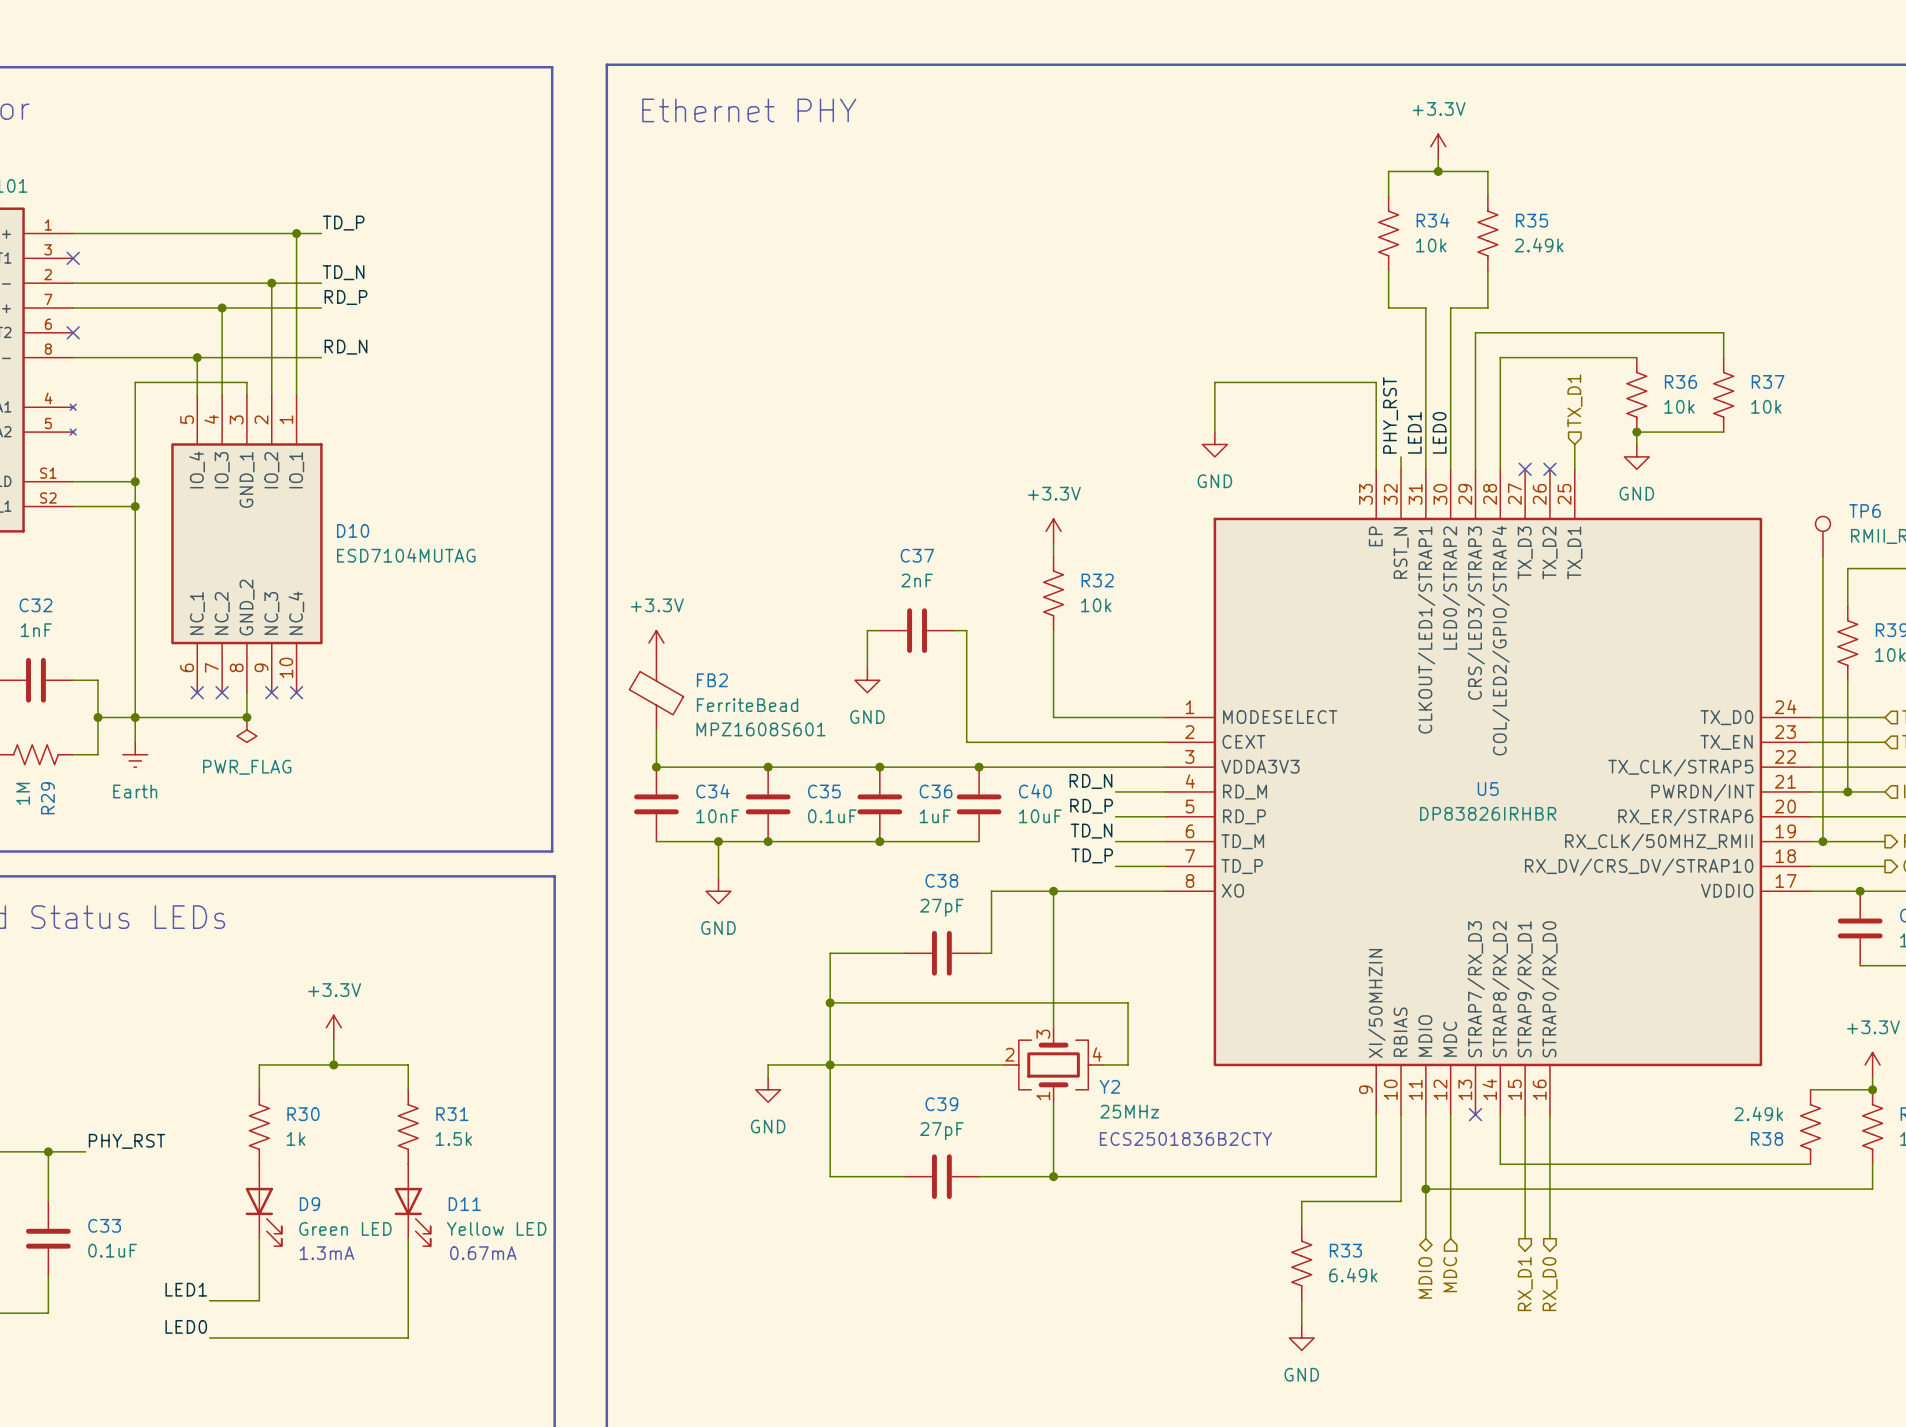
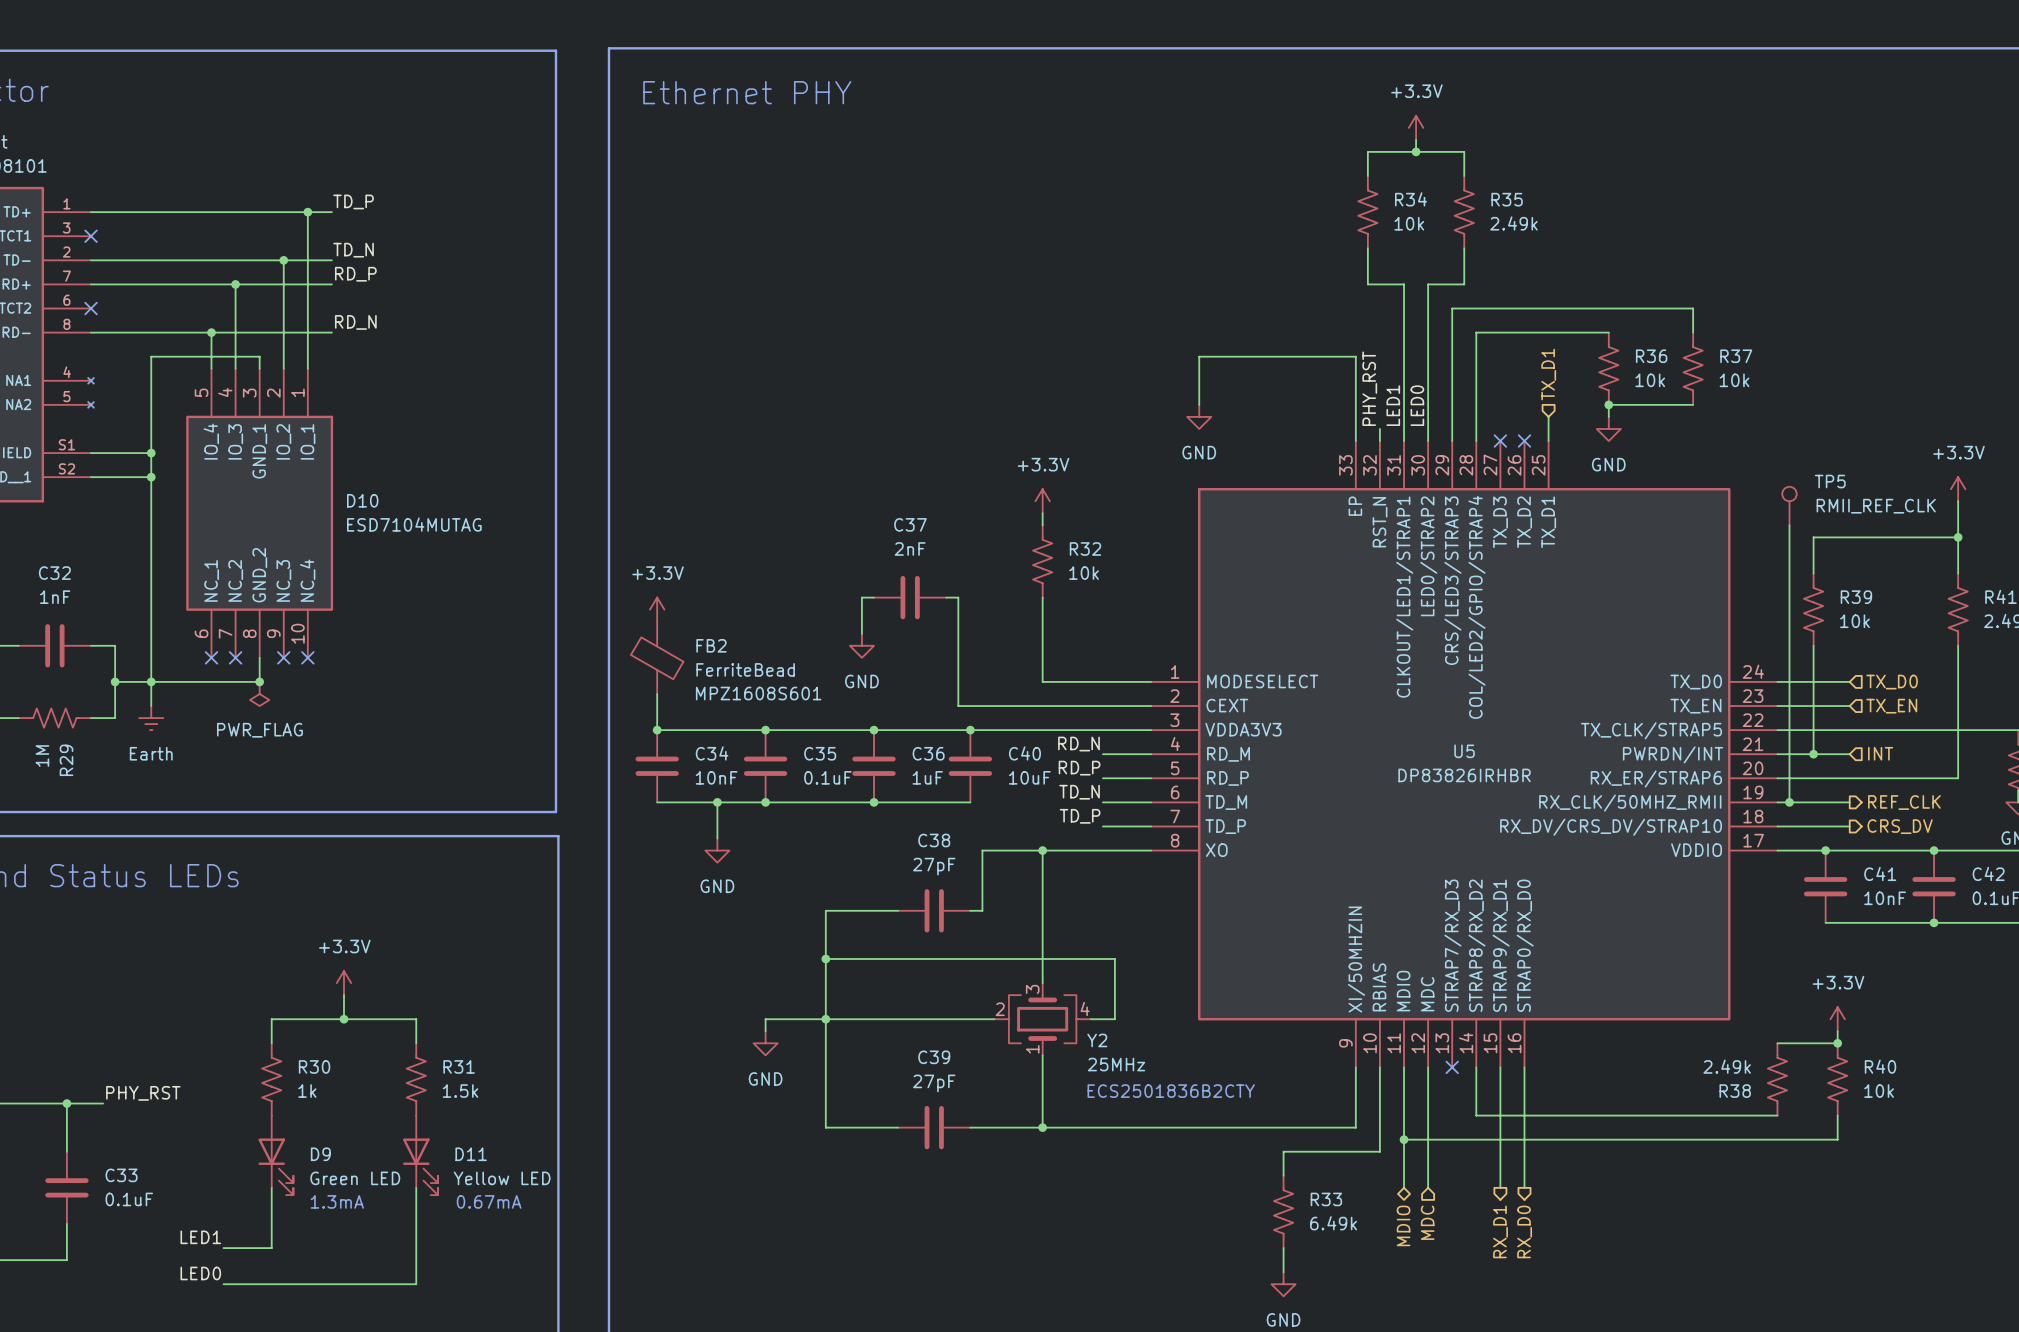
TP6 name: TP6 (1865, 511) -> TP5 (1830, 481)

